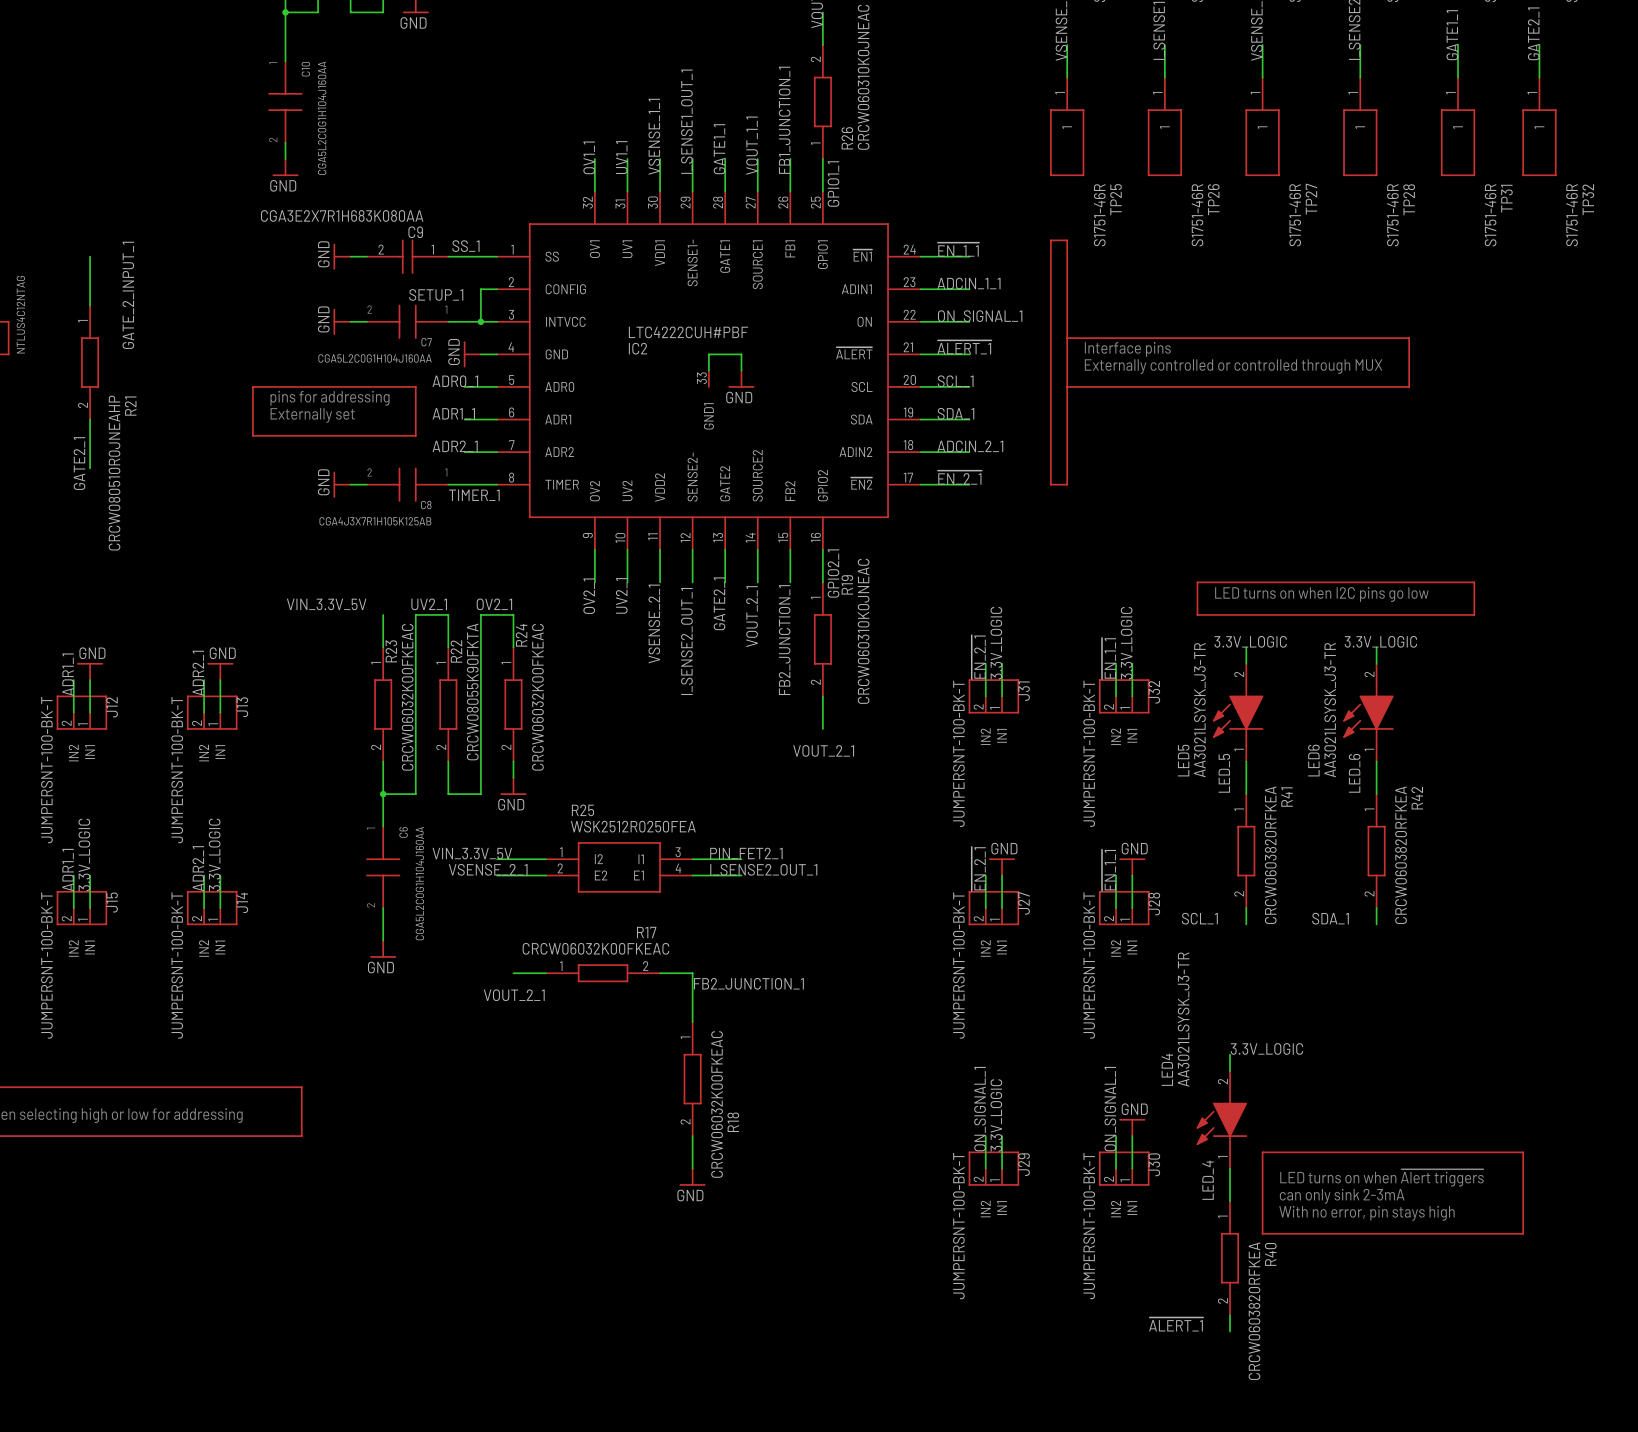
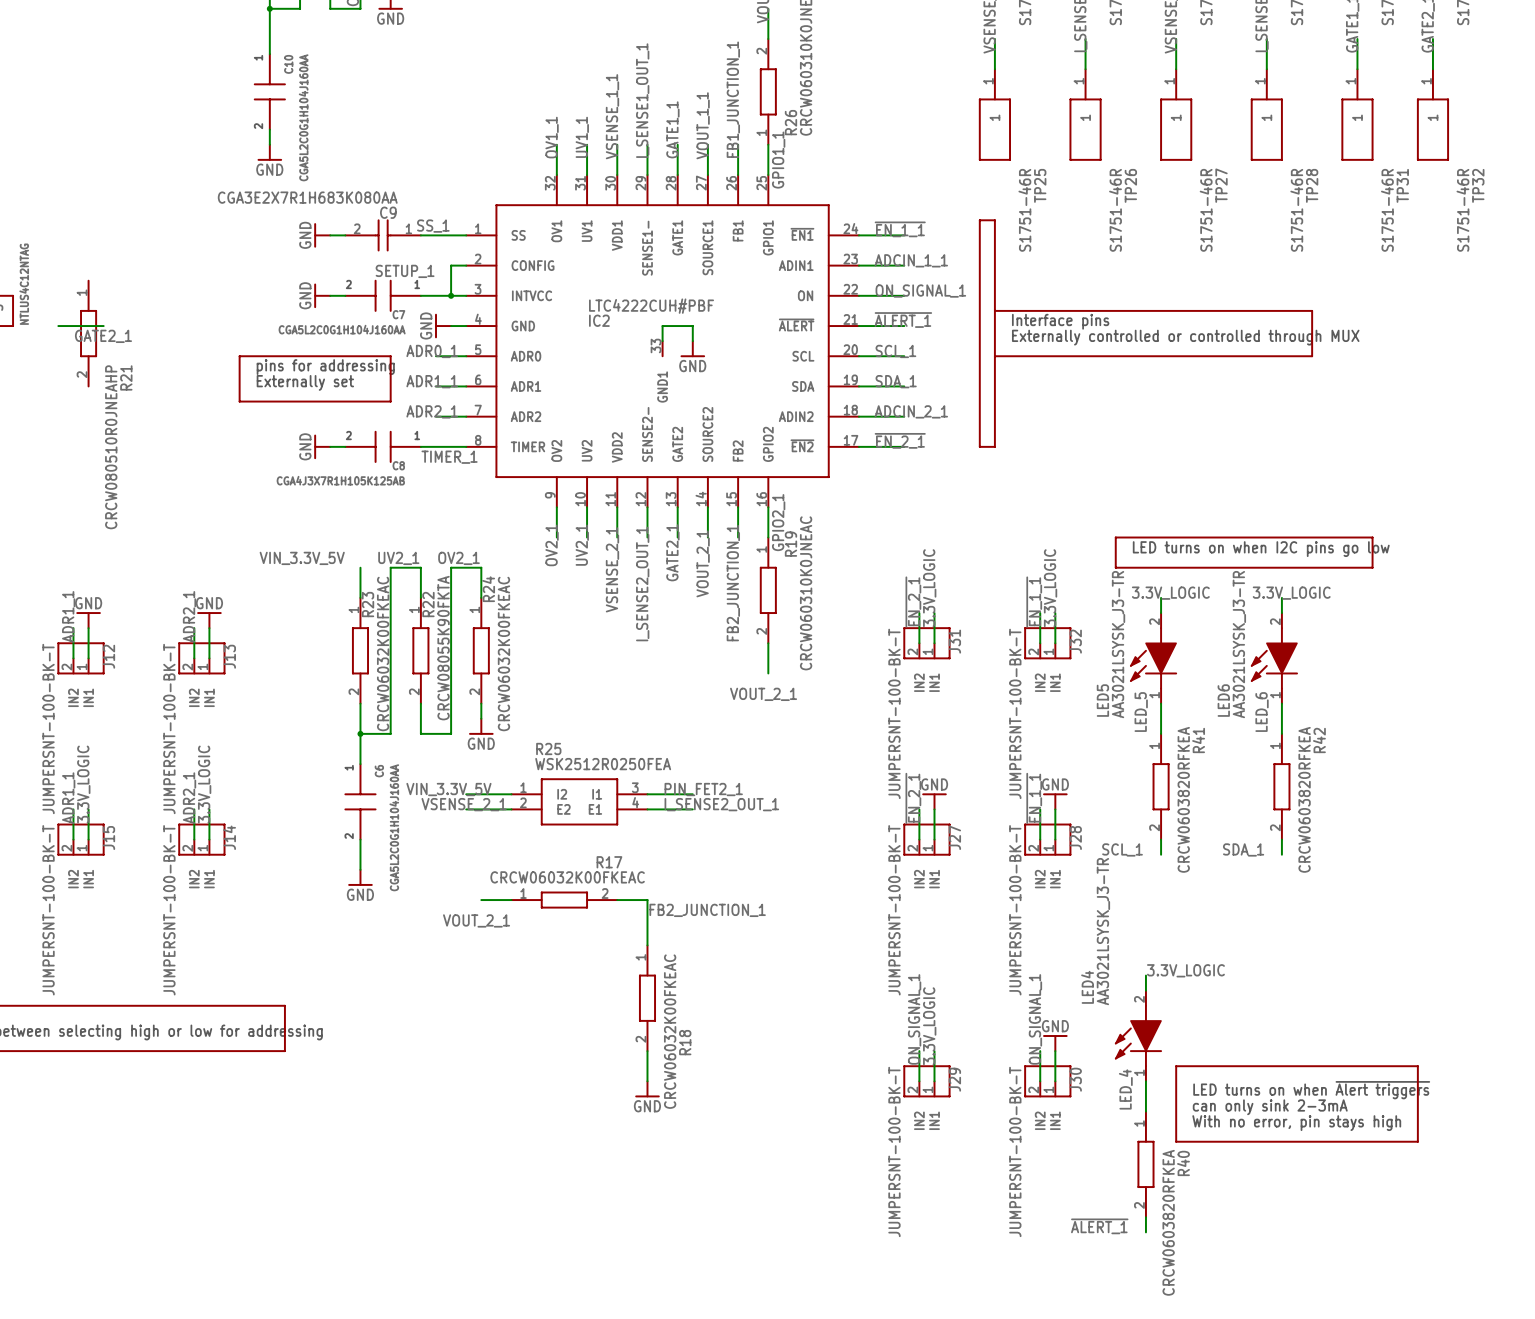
wire: (90, 256) (90, 305) -> none
label: GATE_2_INPUT_1 (128, 295) -> none
wire: none -> (58, 326) (103, 326)
wire: (90, 419) (90, 468) -> none
label rotation: 0° (79, 463) -> 90° clockwise (103, 336)
label position: GATE2_1 (79, 463) -> GATE2_1 (103, 336)

